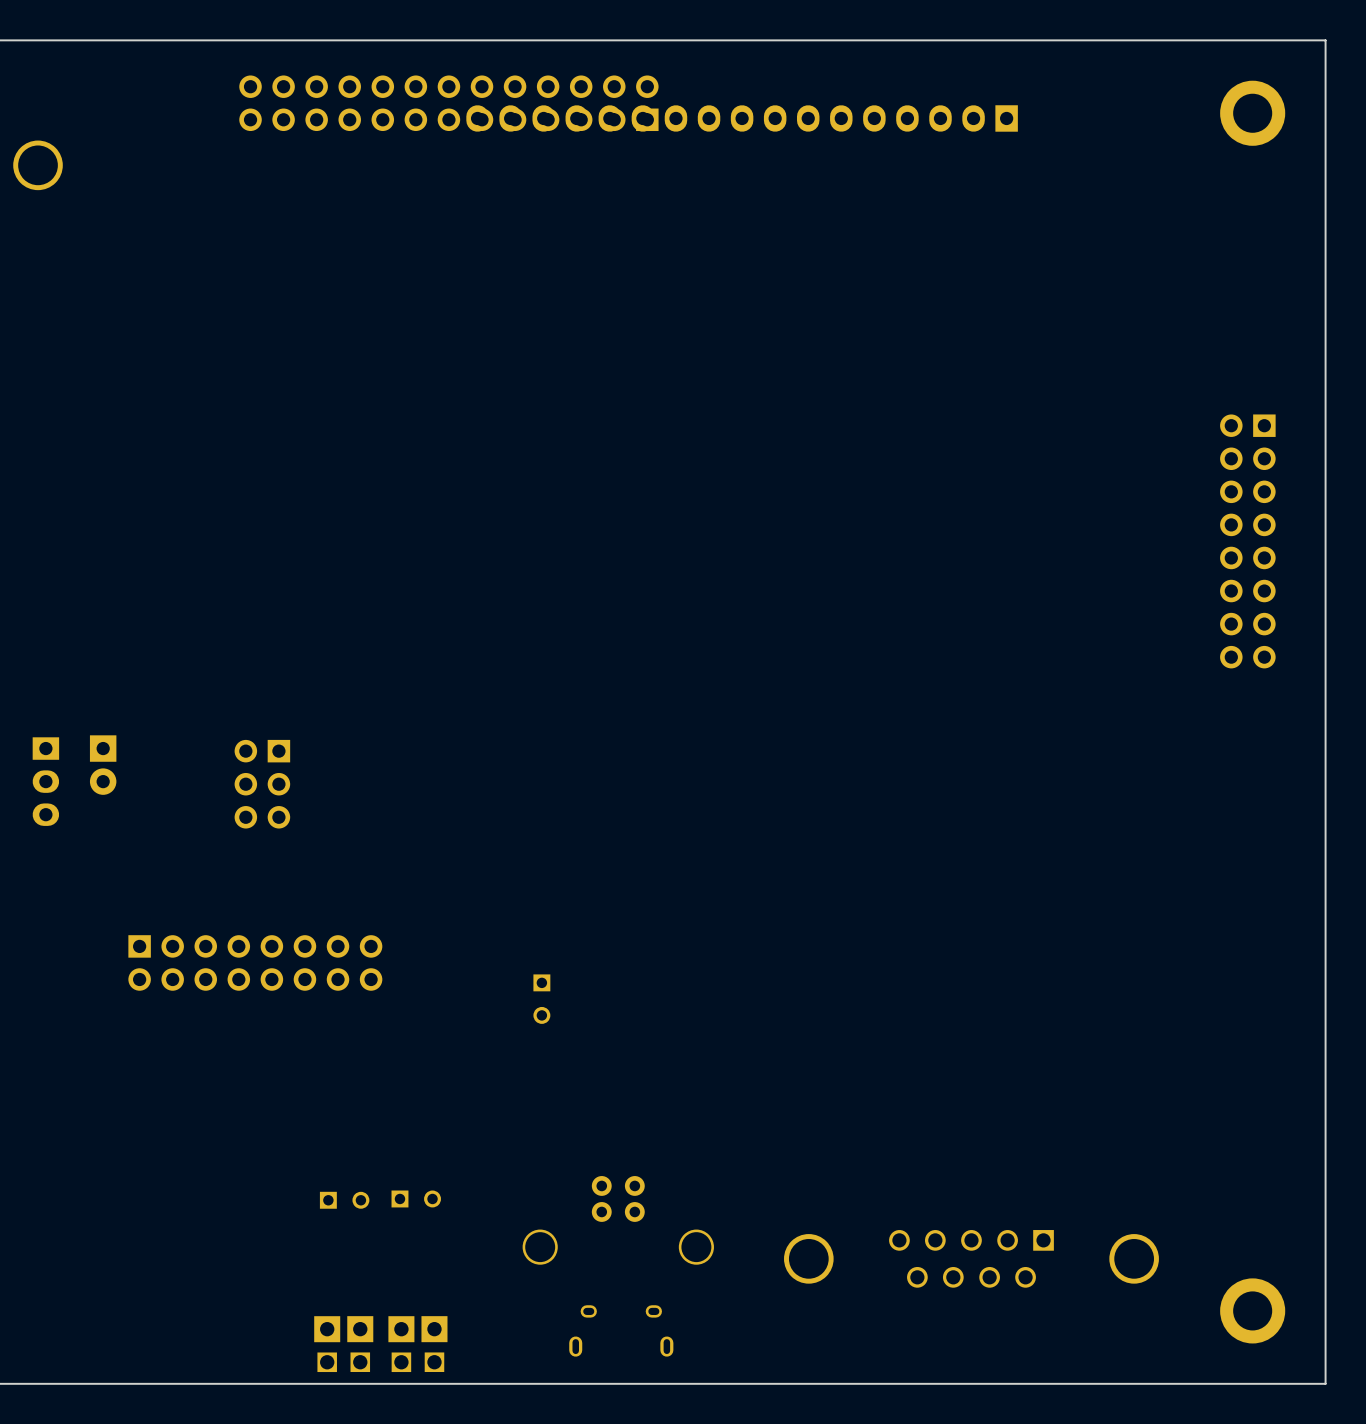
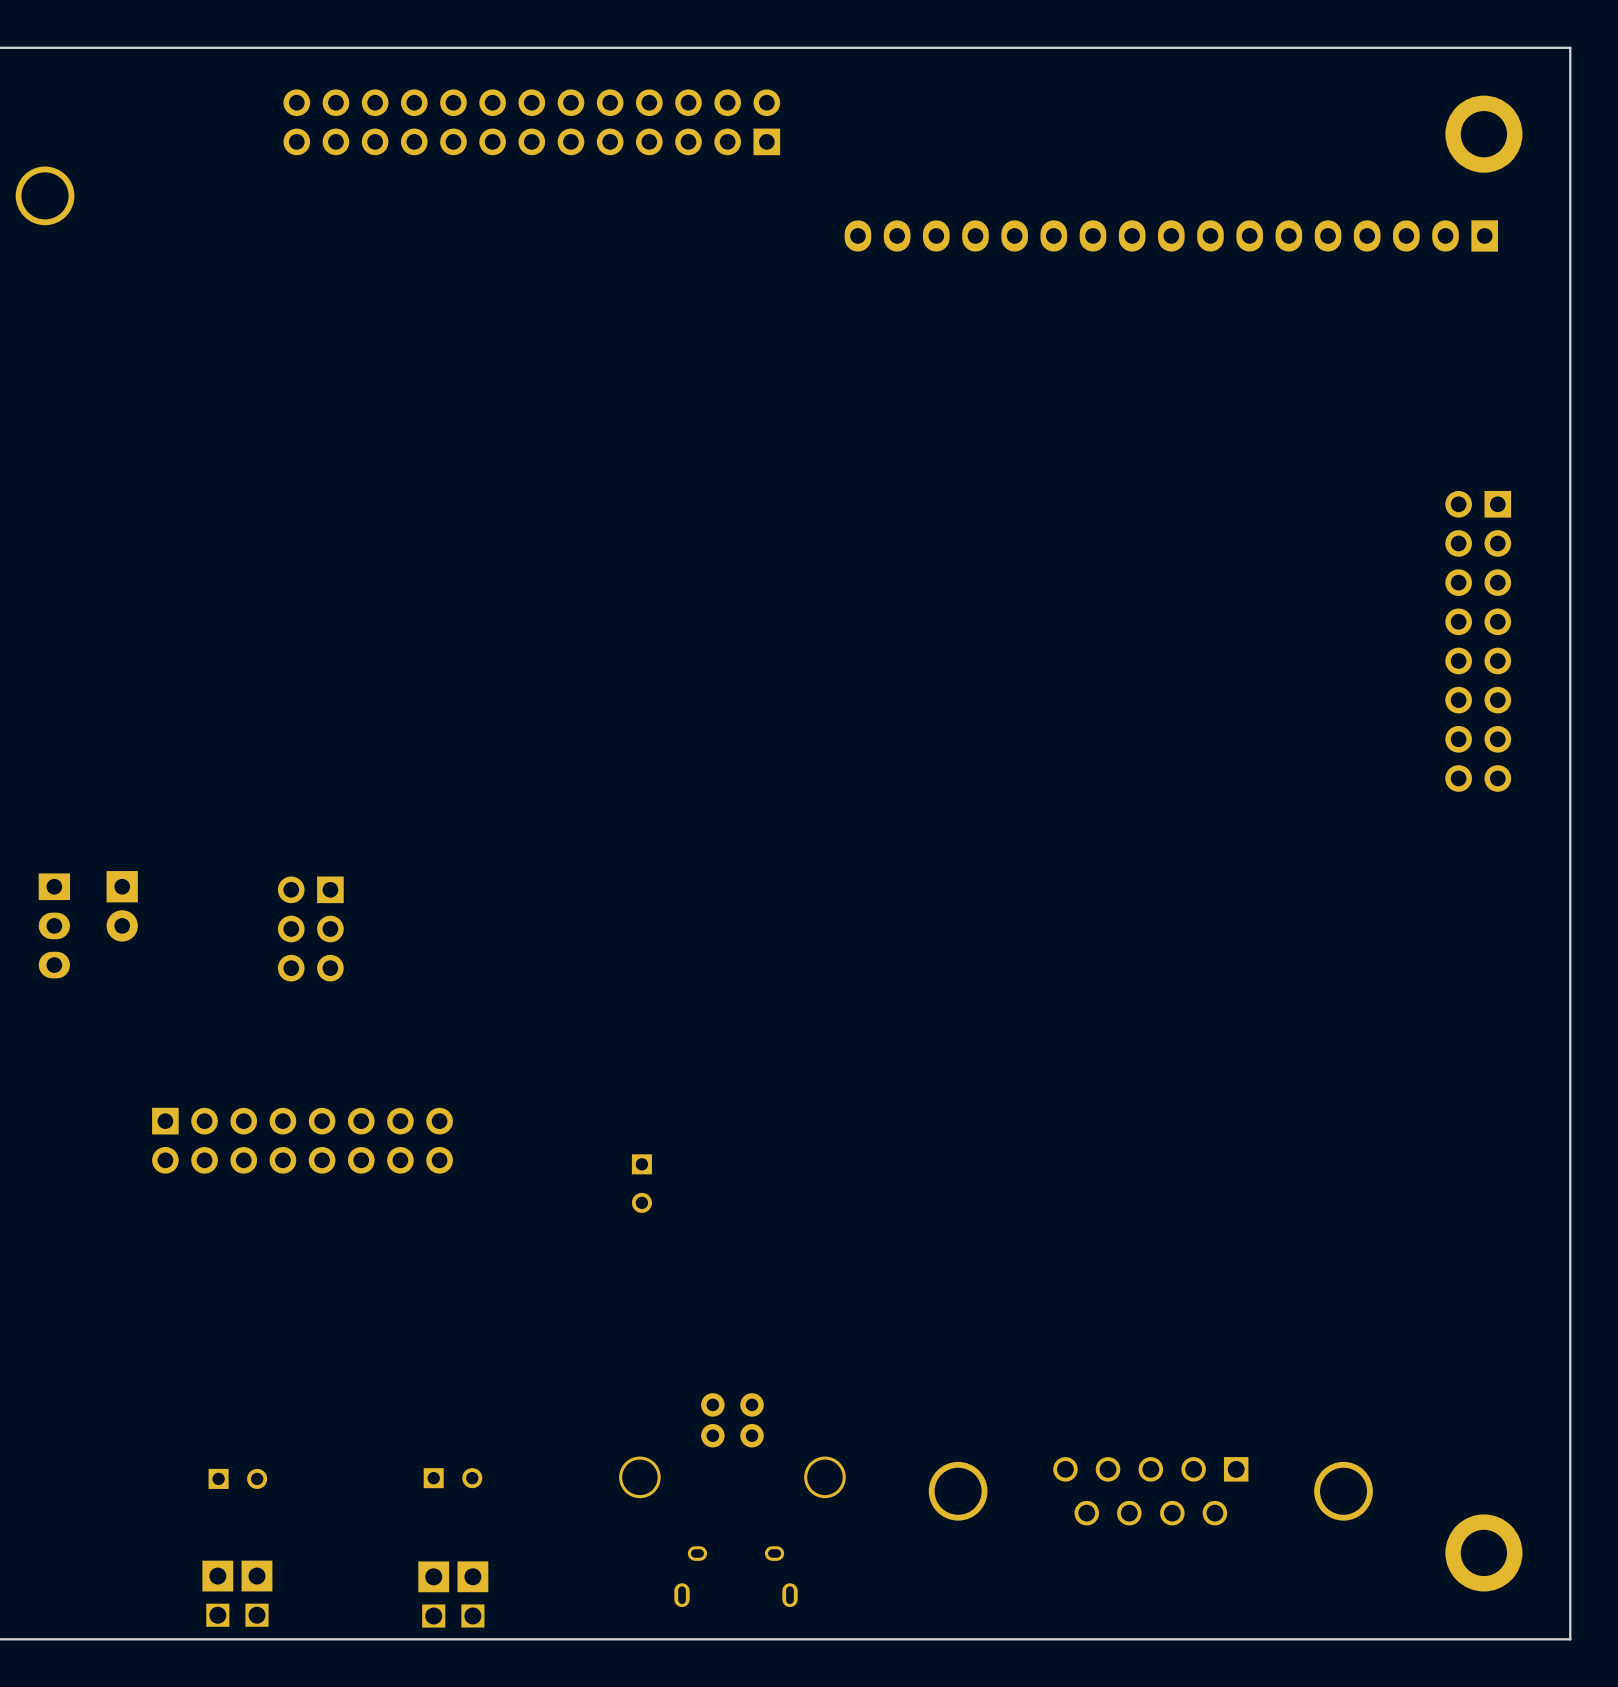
part position: (742, 118) -> (1171, 235)
part: (416, 1198) -> none
part: (344, 1200) -> none
part: none -> (453, 1478)
part: none -> (237, 1478)
part: (343, 1344) -> none
part: (417, 1344) -> none
part: none -> (237, 1593)
part: none -> (453, 1594)

